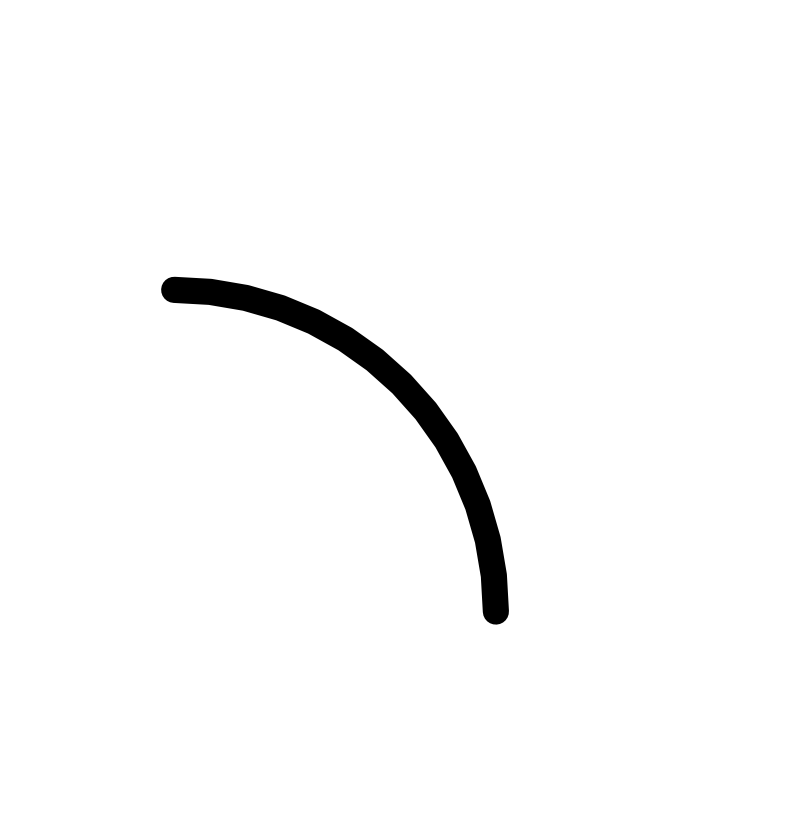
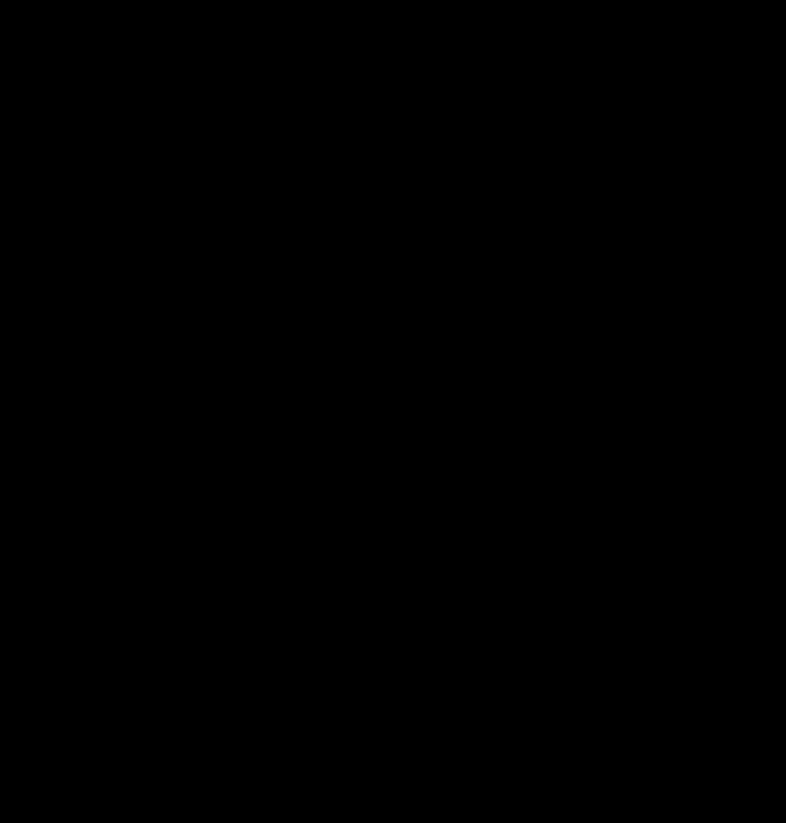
board edge: (174, 289) (210, 291) (245, 297) (280, 307) (313, 321) (345, 339) (374, 360) (401, 384) (425, 410) (446, 440) (464, 471) (477, 505) (487, 539) (493, 575) (495, 611) -> none

